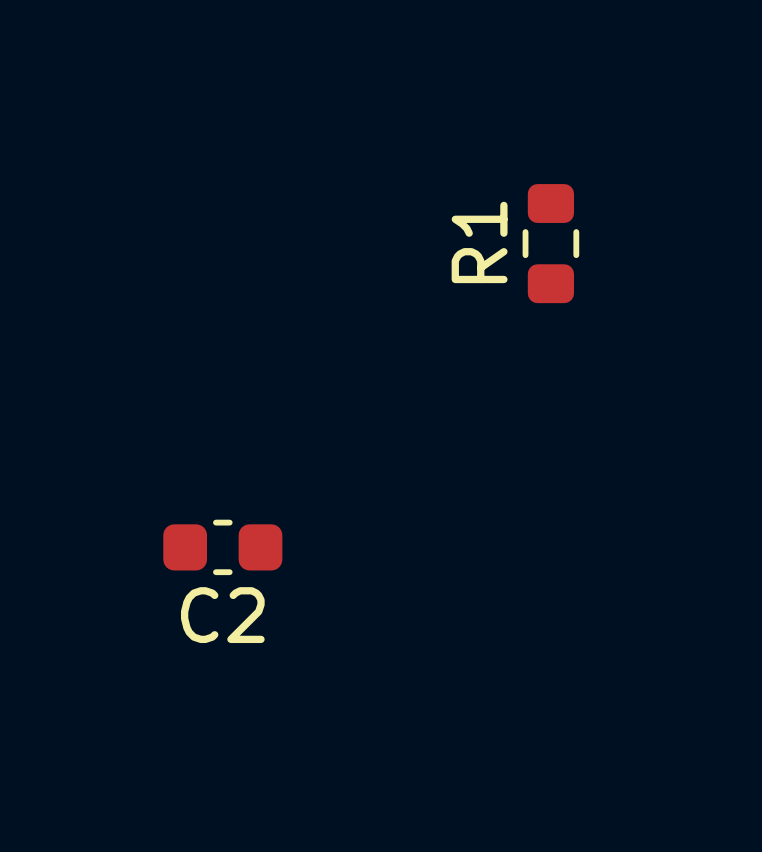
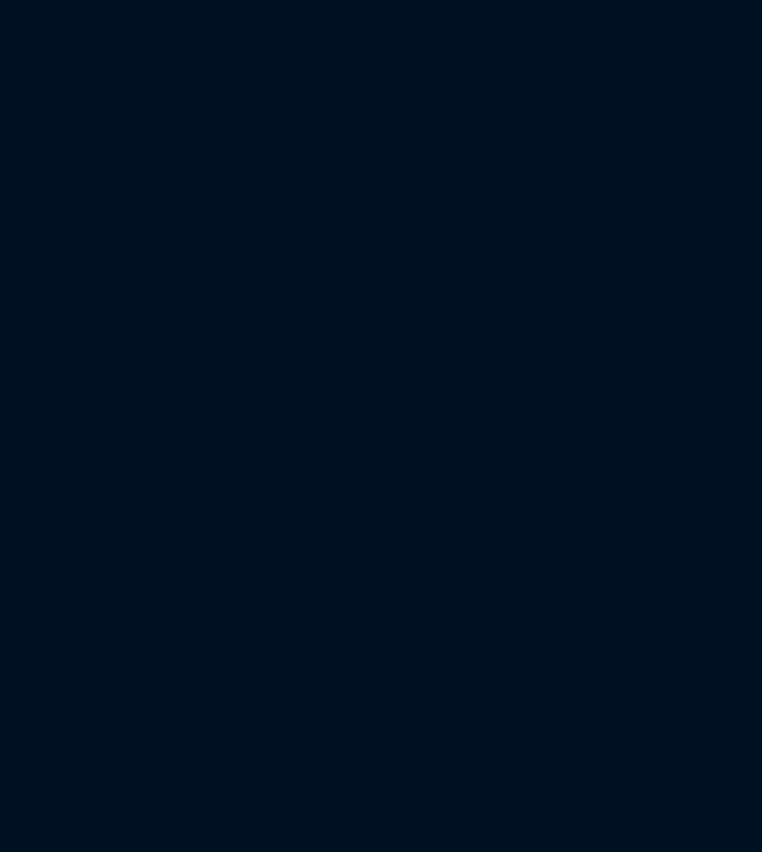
R1: (550, 243) -> none
C2: (222, 547) -> none

